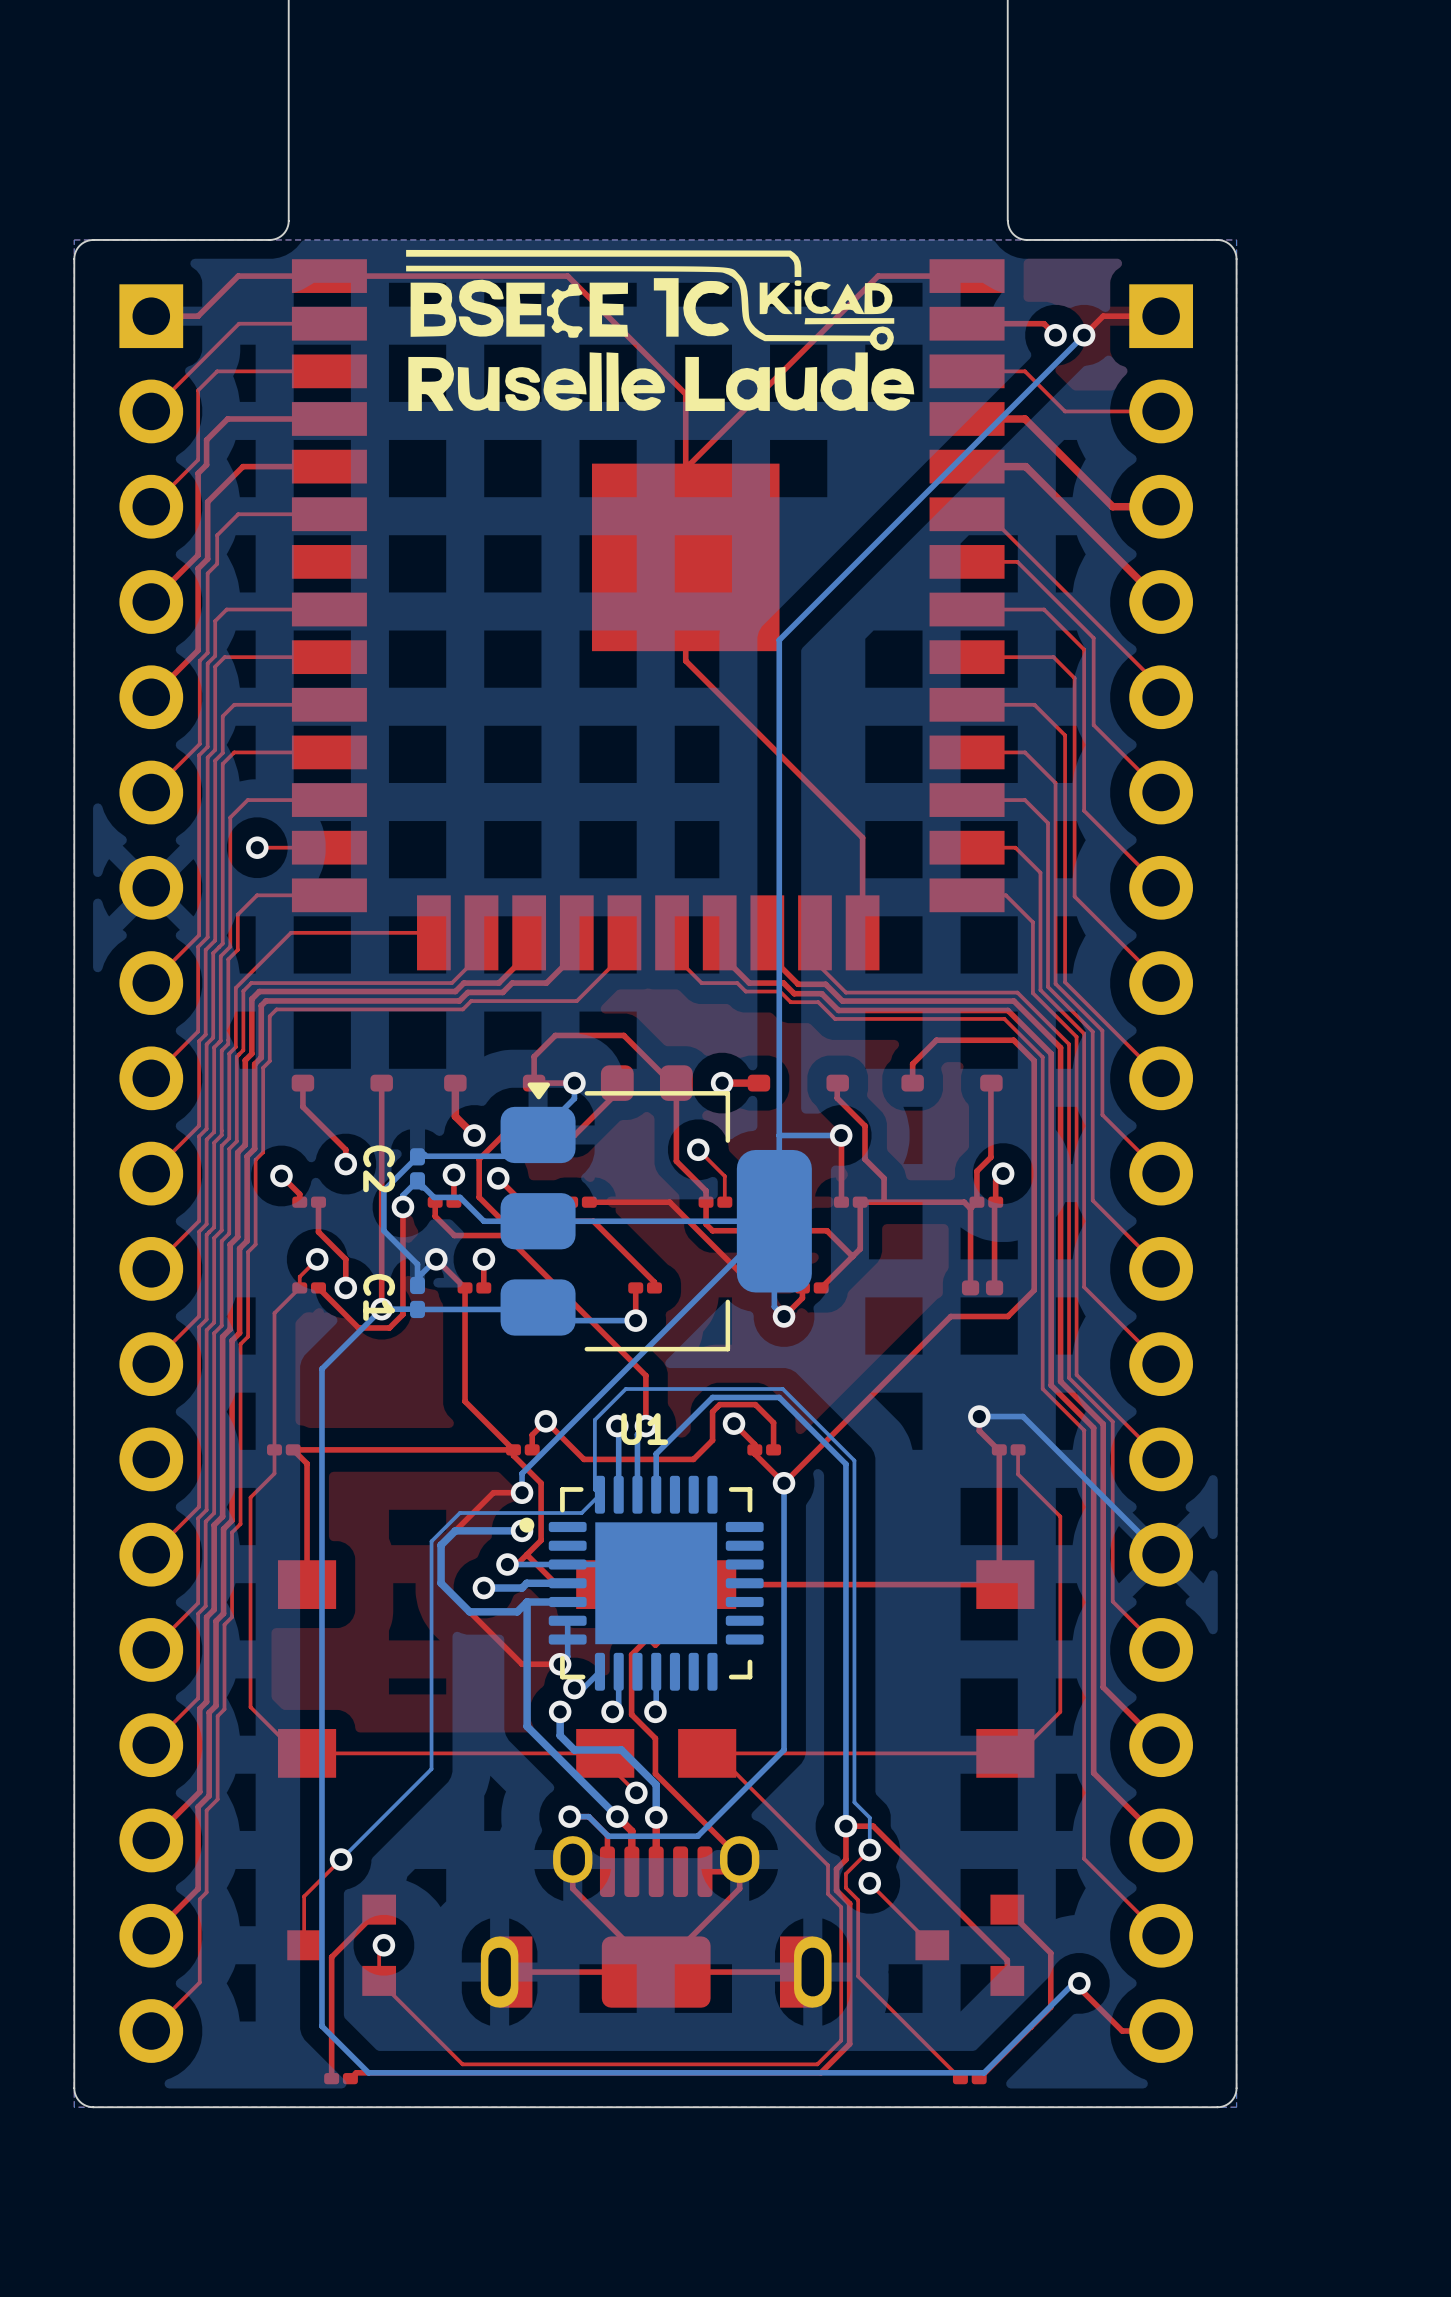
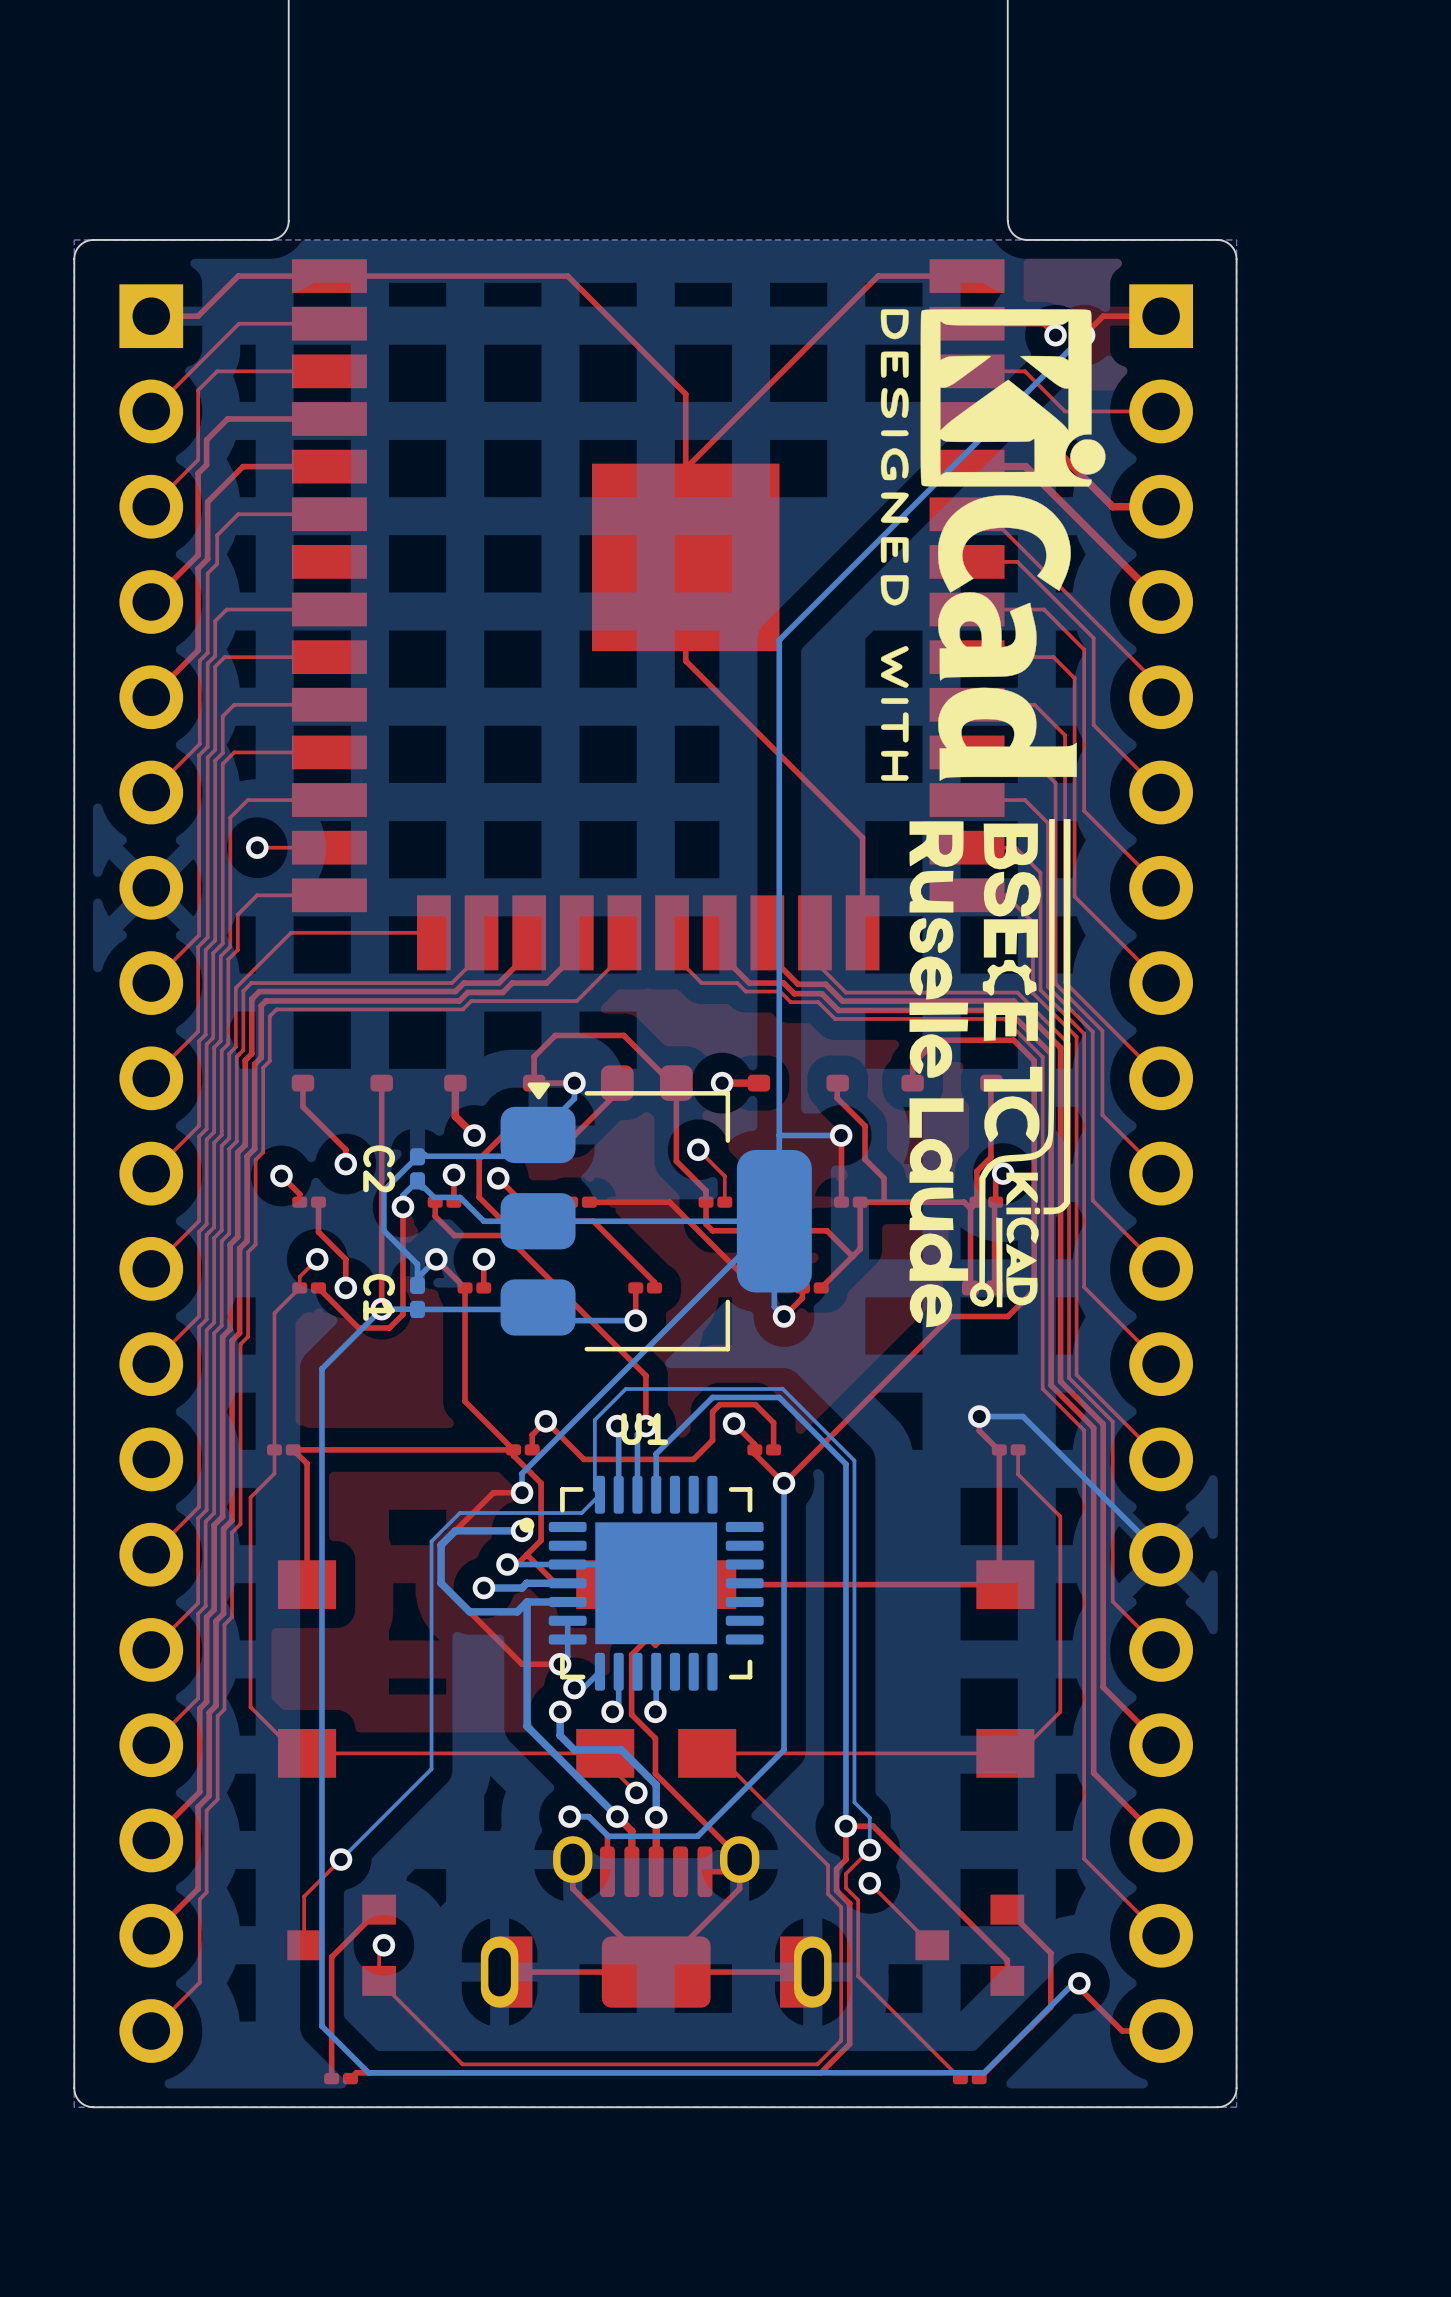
drawing: [406, 249, 915, 412] -> none
drawing: none -> [880, 309, 1106, 1328]

